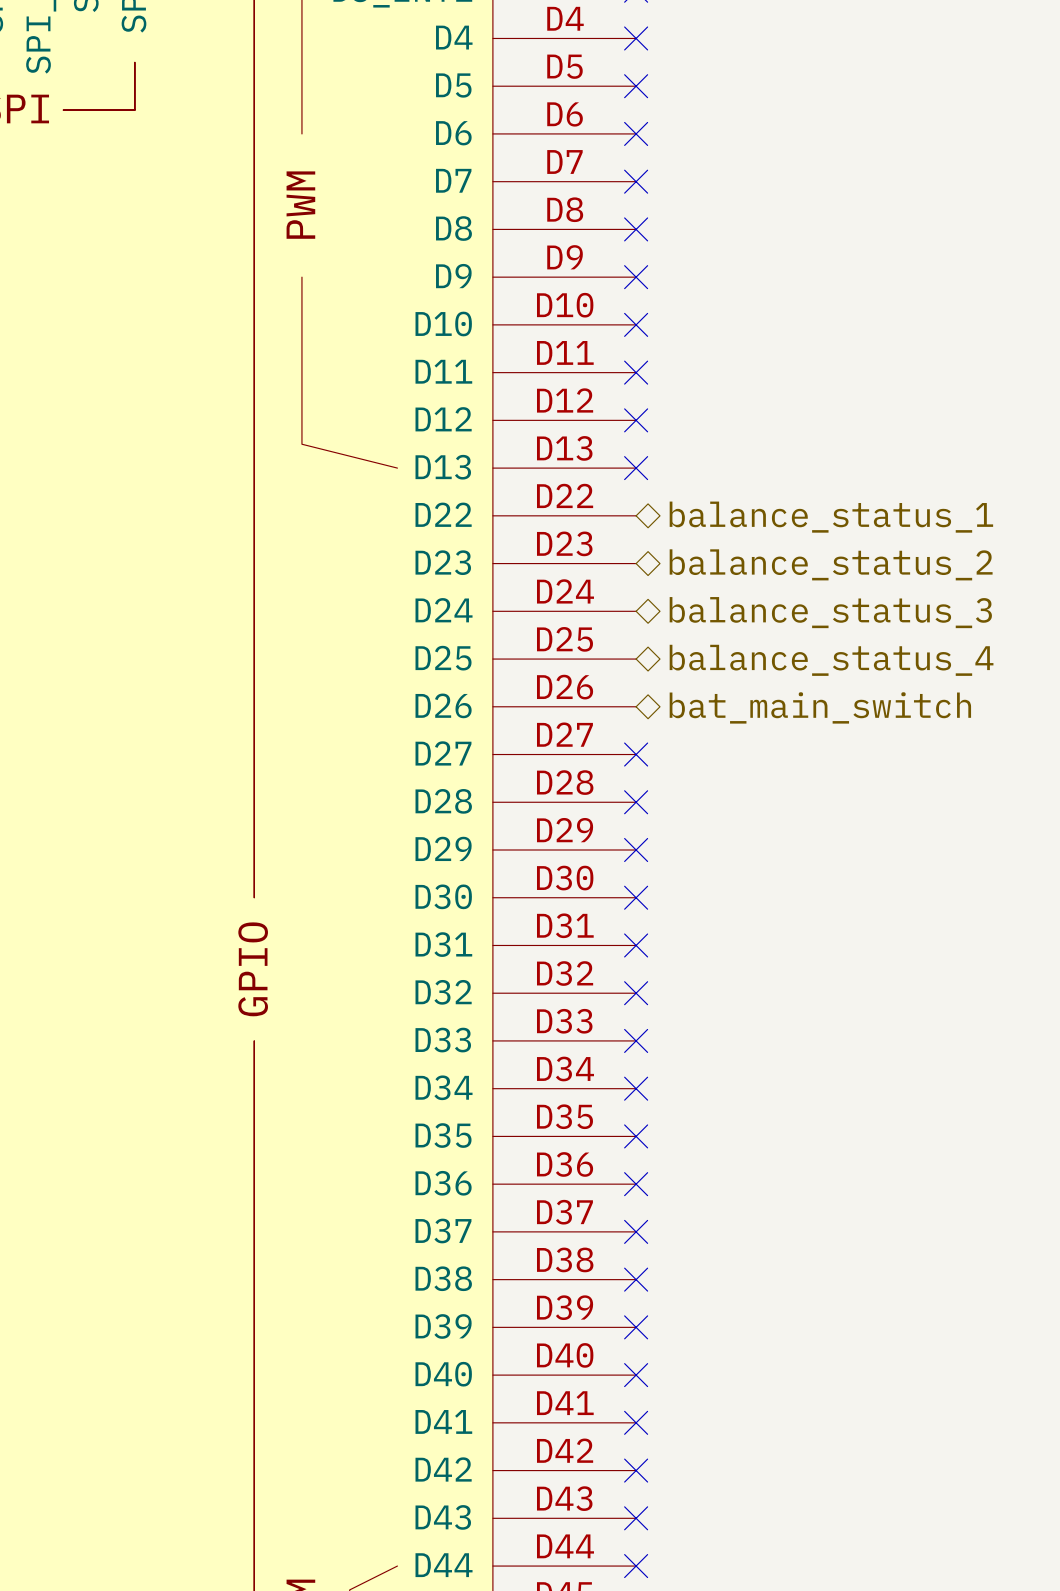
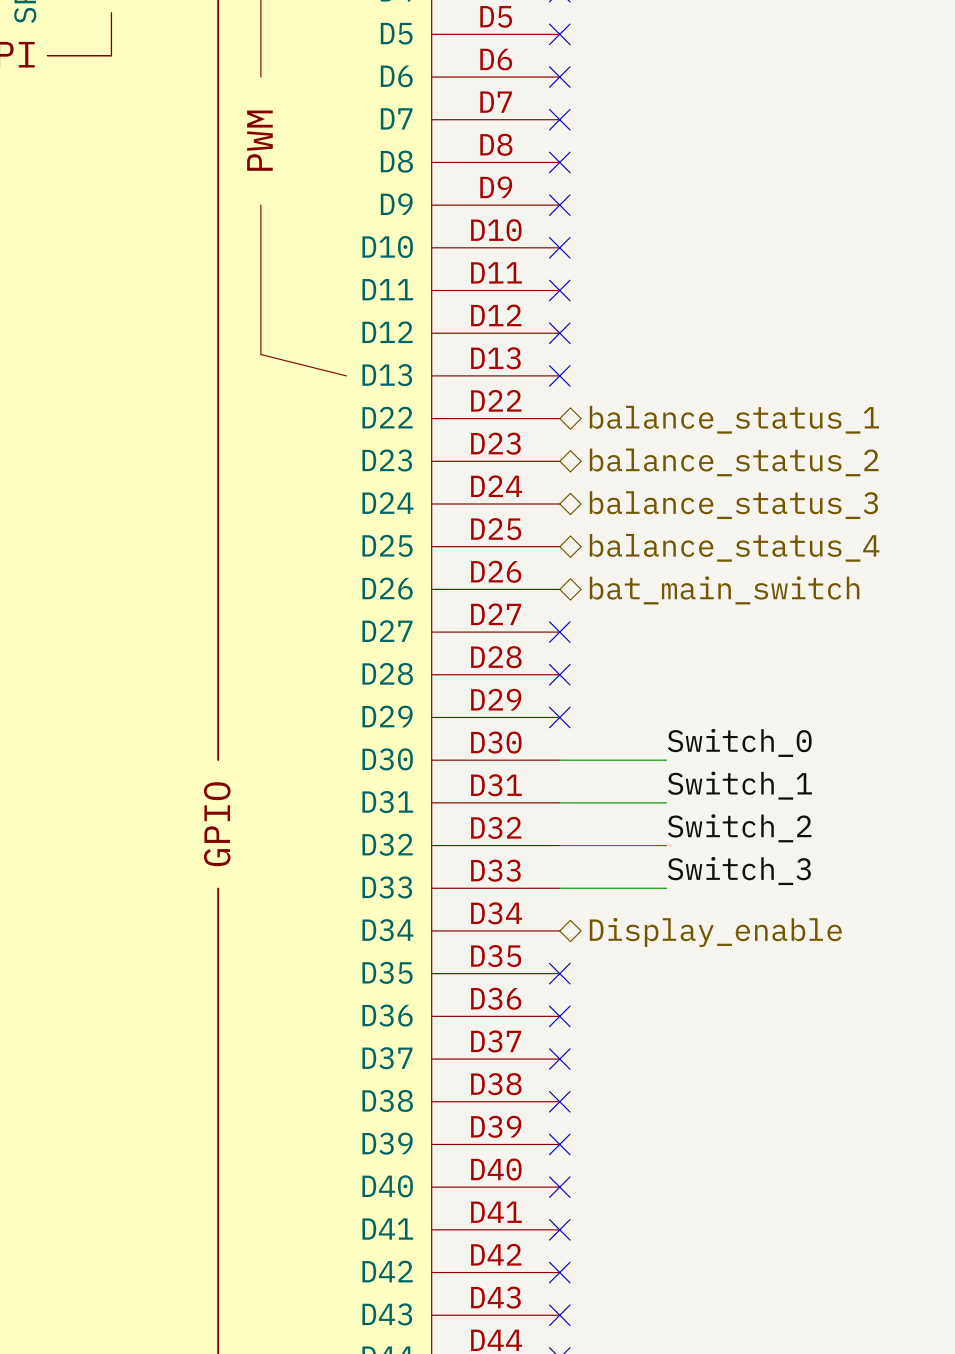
label: none -> Switch_0 (739, 742)
wire: none -> (559, 760) (666, 760)
no-connect mark: (636, 897) -> none
label: none -> Switch_1 (739, 785)
wire: none -> (559, 802) (666, 802)
no-connect mark: (636, 945) -> none
label: none -> Switch_2 (739, 828)
wire: none -> (559, 845) (666, 845)
no-connect mark: (636, 993) -> none
label: none -> Switch_3 (739, 871)
wire: none -> (559, 888) (666, 888)
no-connect mark: (636, 1040) -> none
no-connect mark: (636, 1088) -> none
hierarchical label: none -> Display_enable (715, 932)

